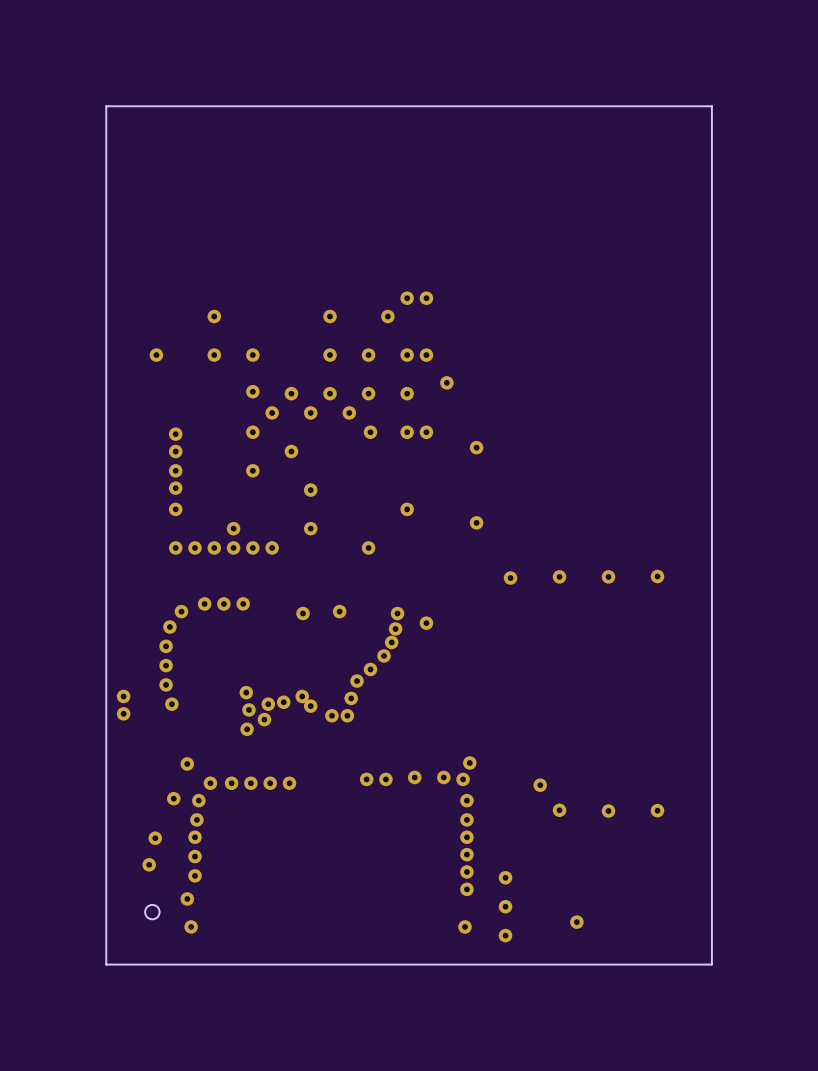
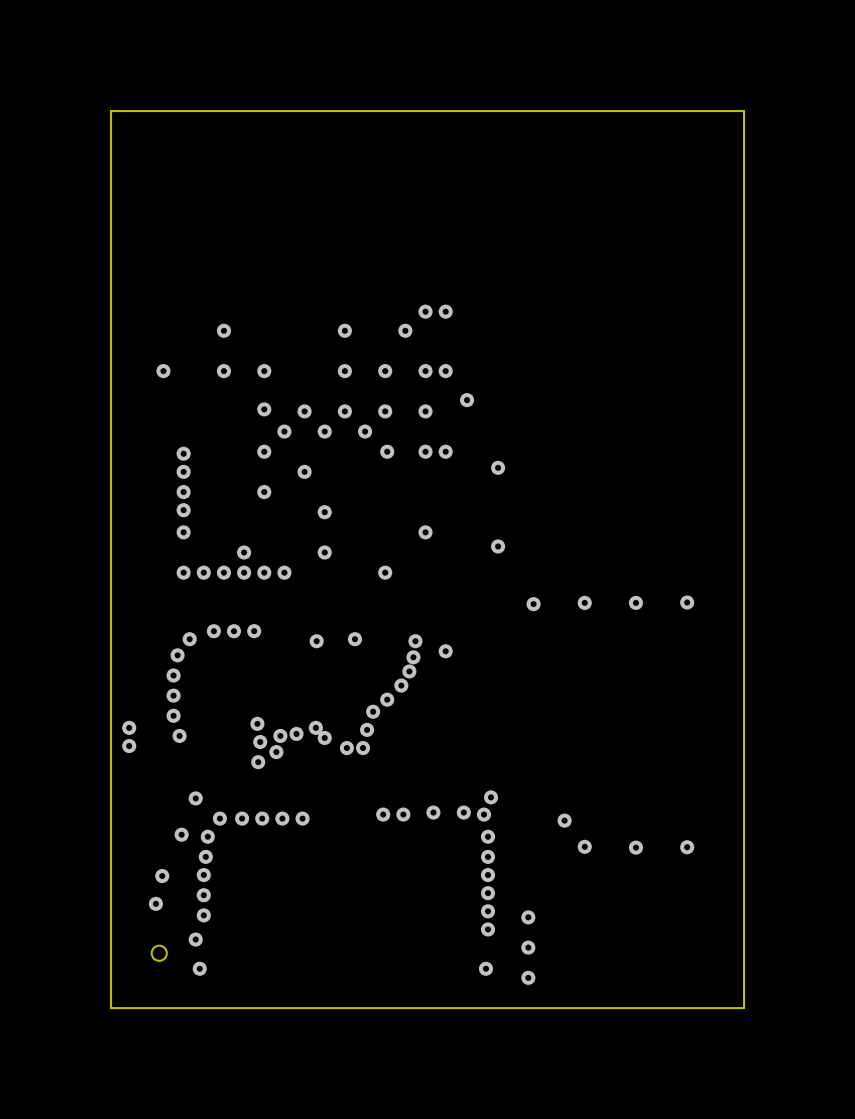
via: (576, 922) -> none

